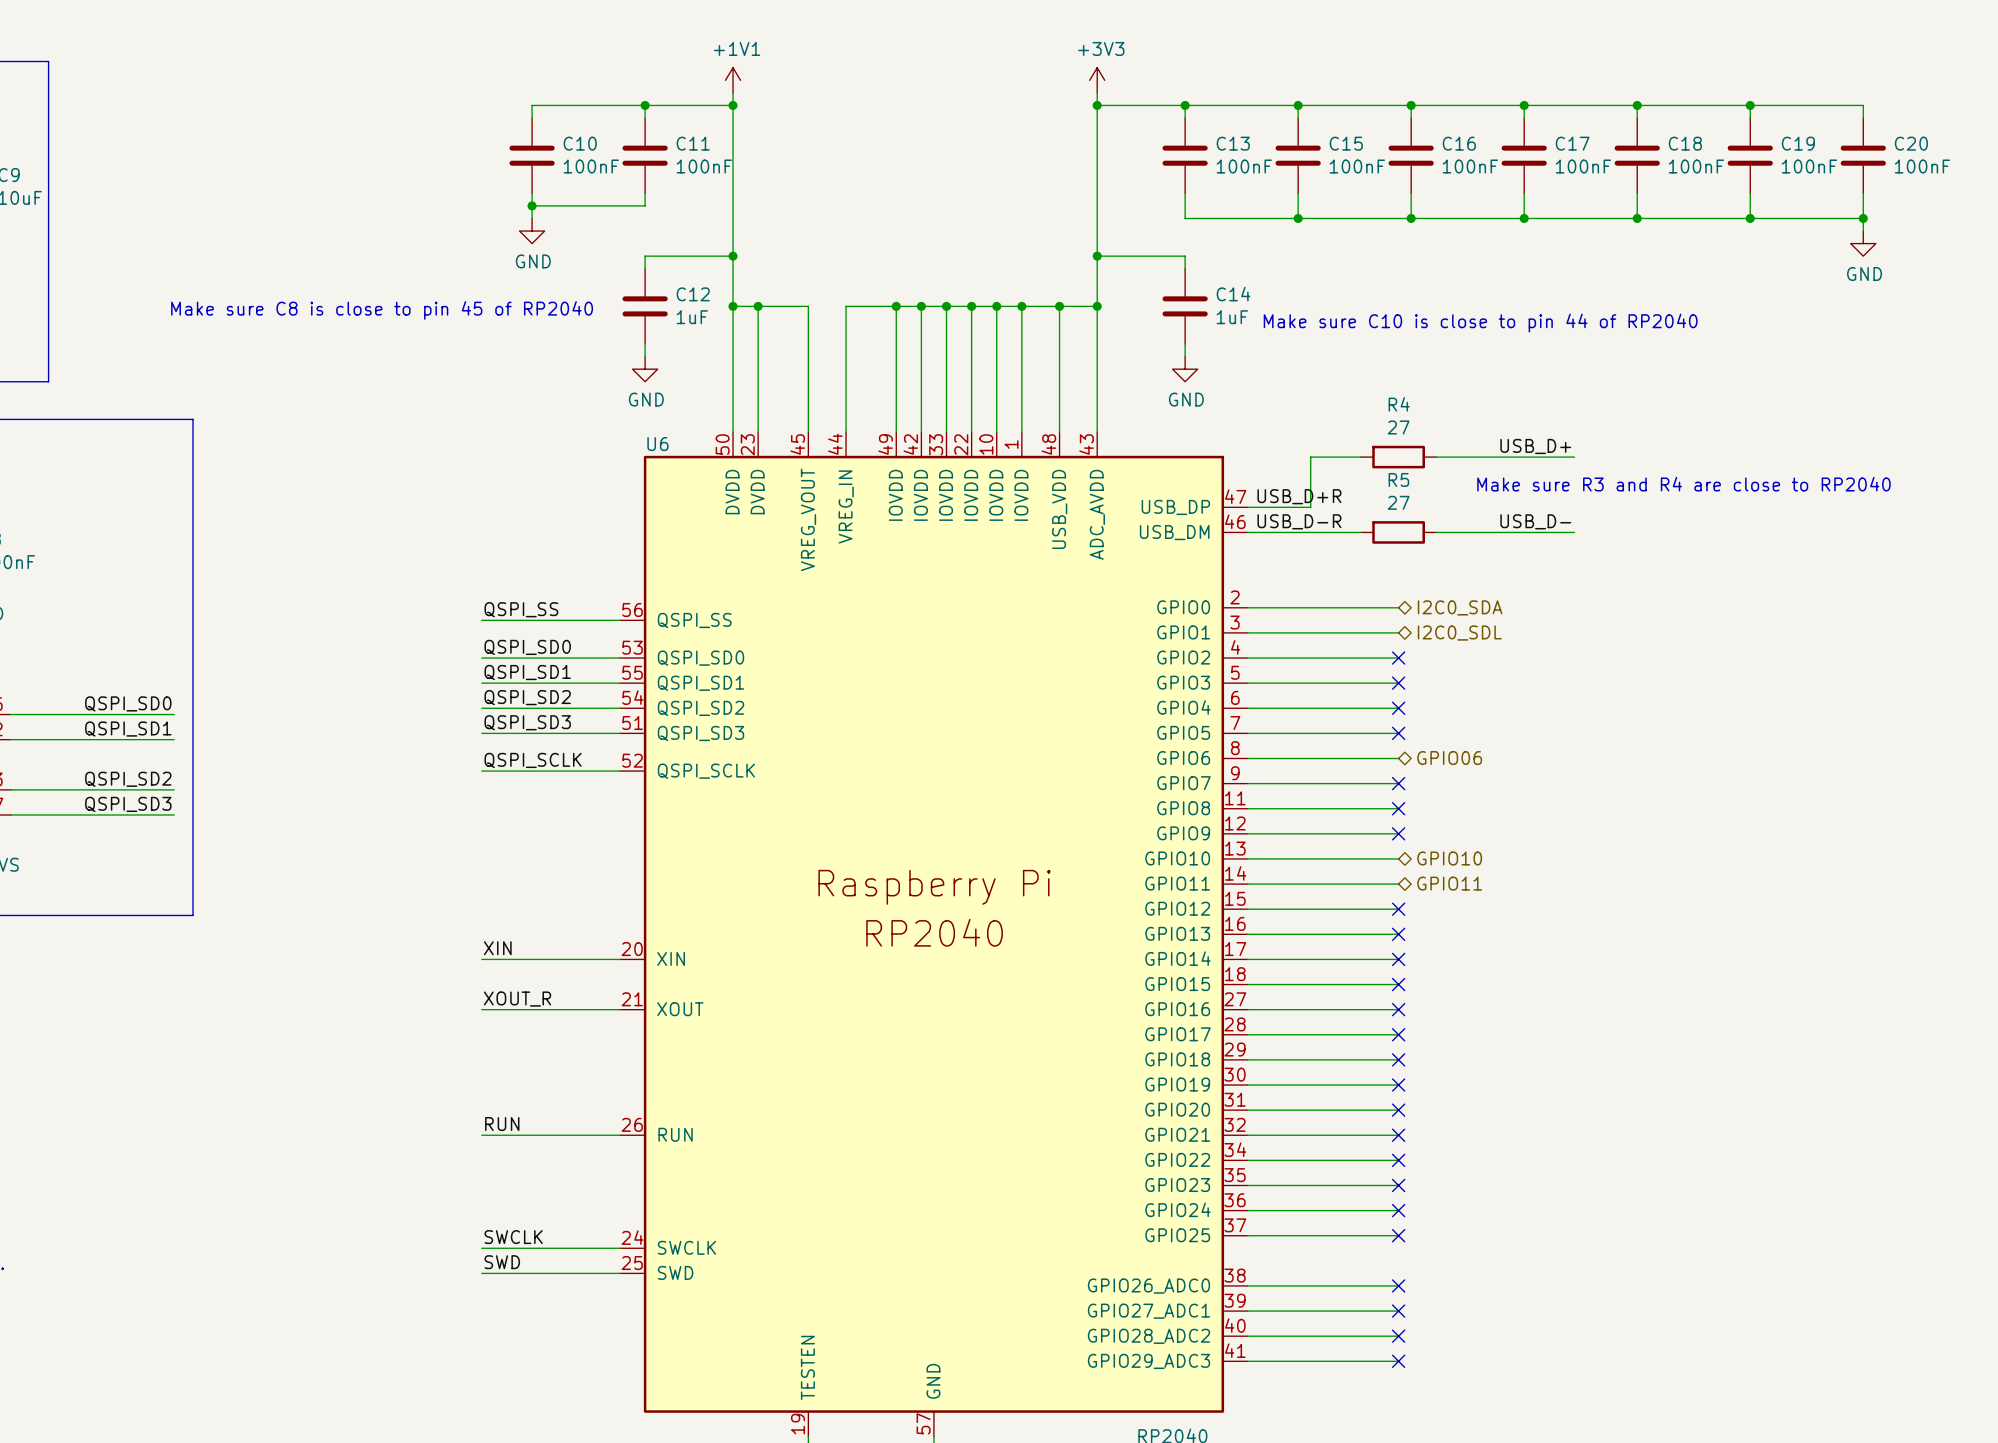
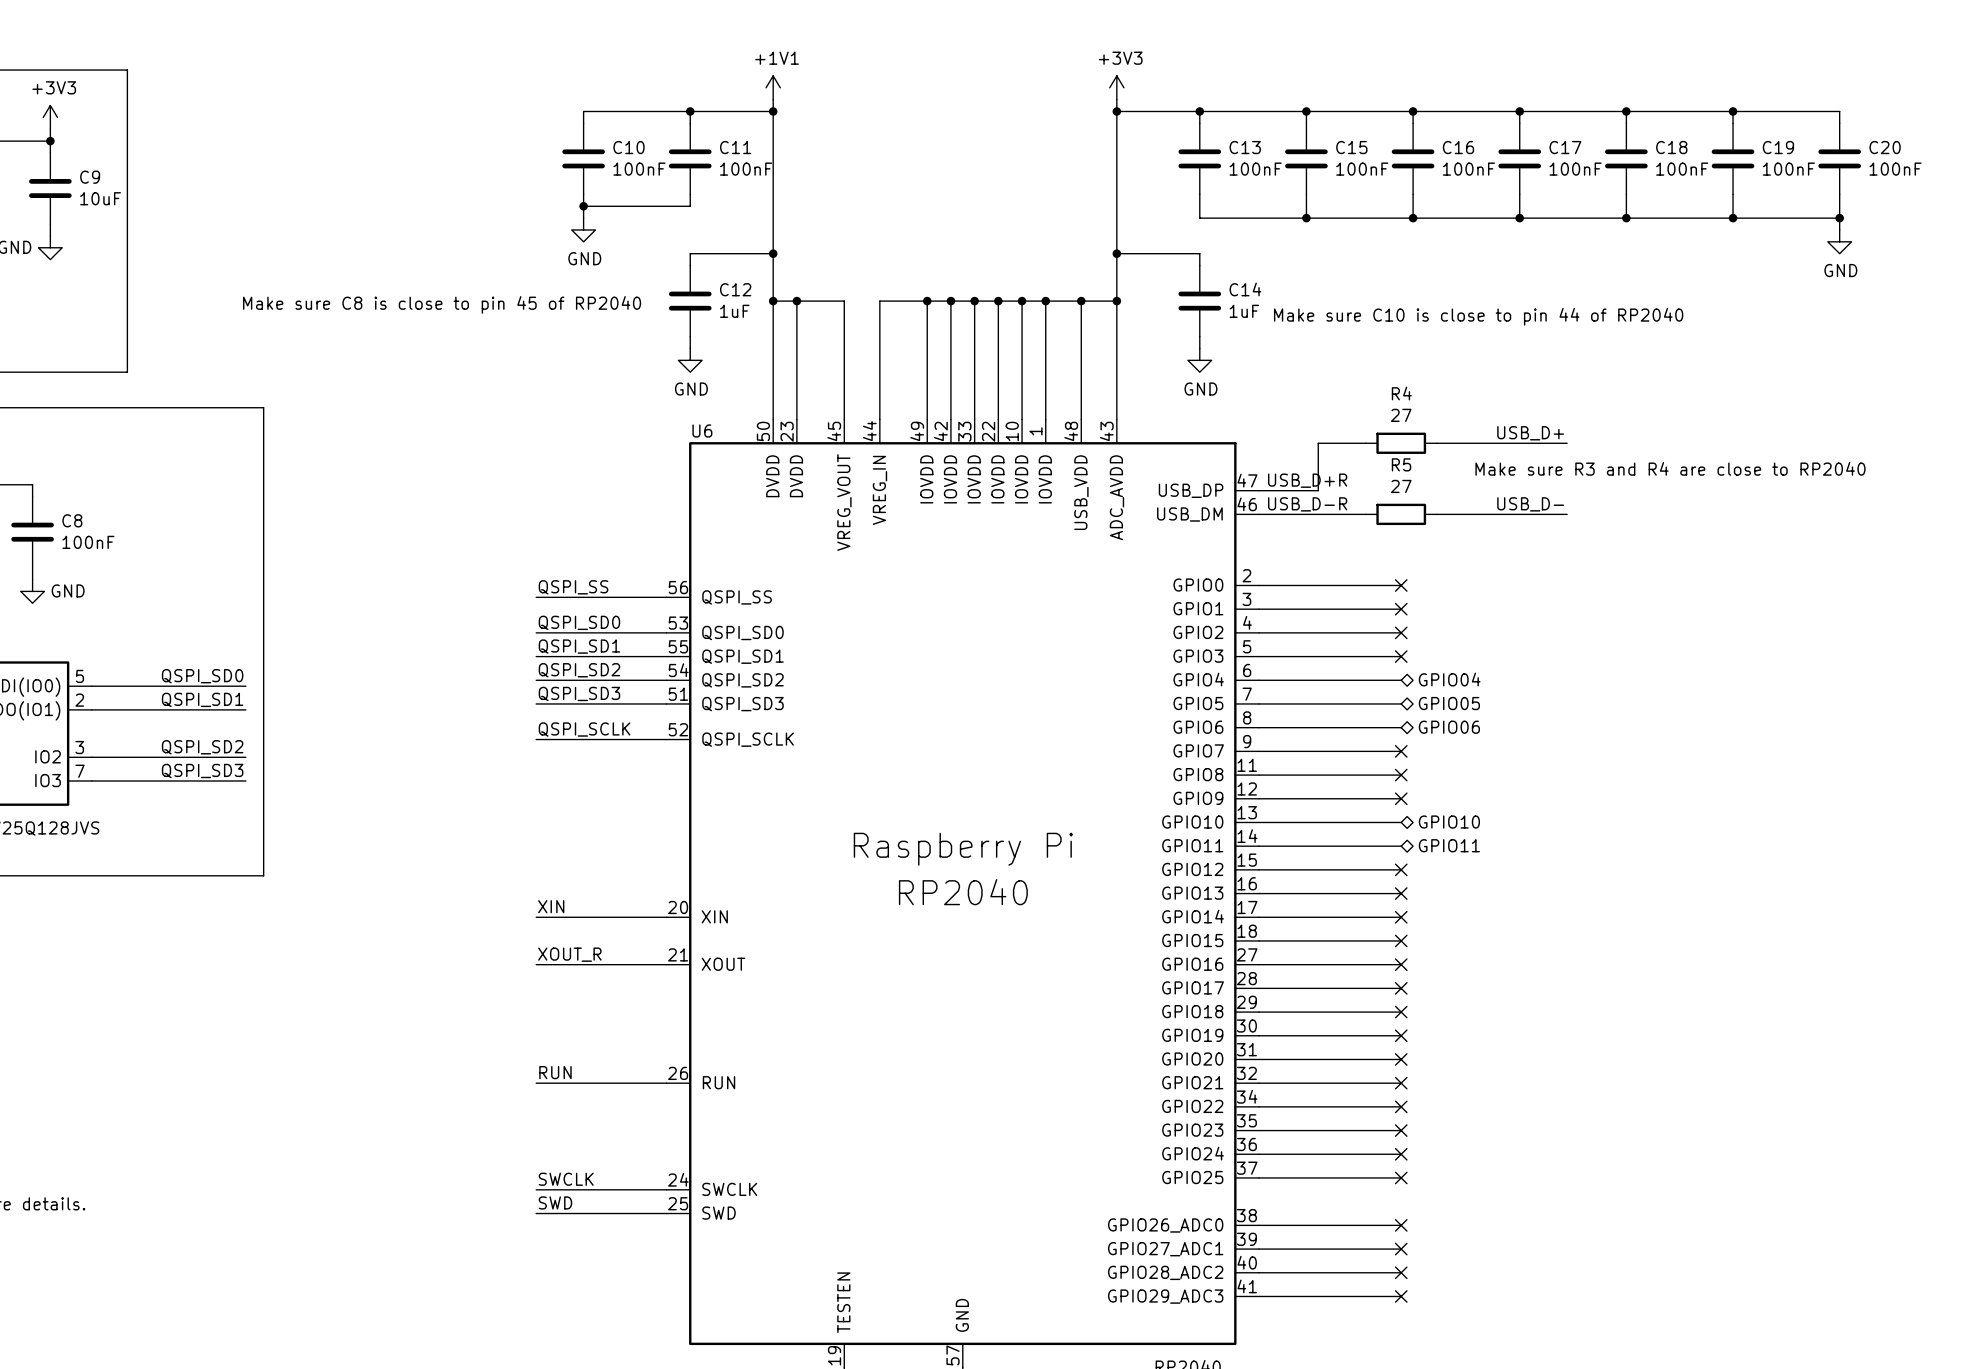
no-connect mark: none -> (1401, 585)
hierarchical label: I2C0_SDA (1460, 607) -> none
no-connect mark: none -> (1401, 609)
hierarchical label: I2C0_SDL (1459, 633) -> none
hierarchical label: none -> GPIO04 (1449, 679)
no-connect mark: (1398, 708) -> none
hierarchical label: none -> GPIO05 (1449, 703)
no-connect mark: (1398, 733) -> none

